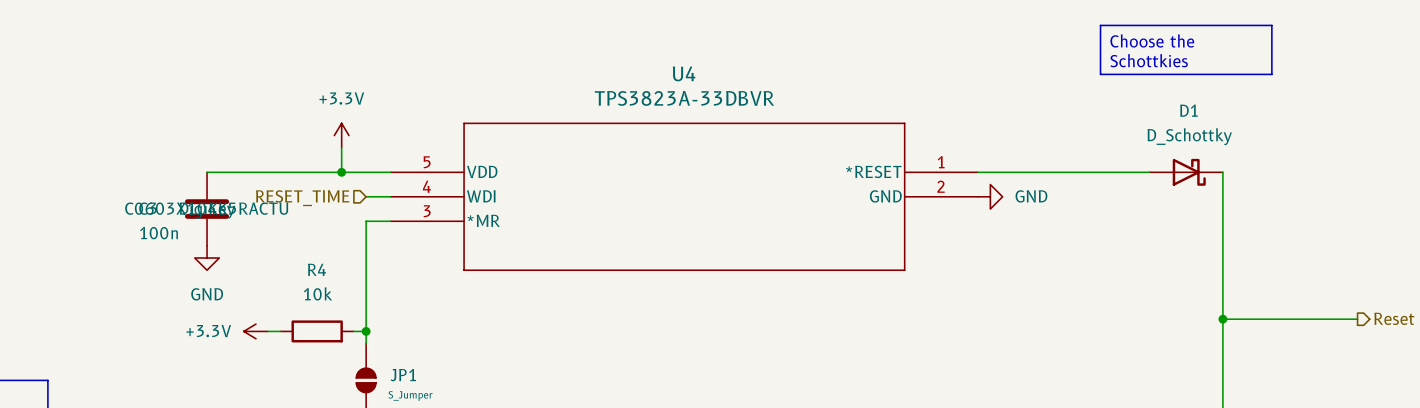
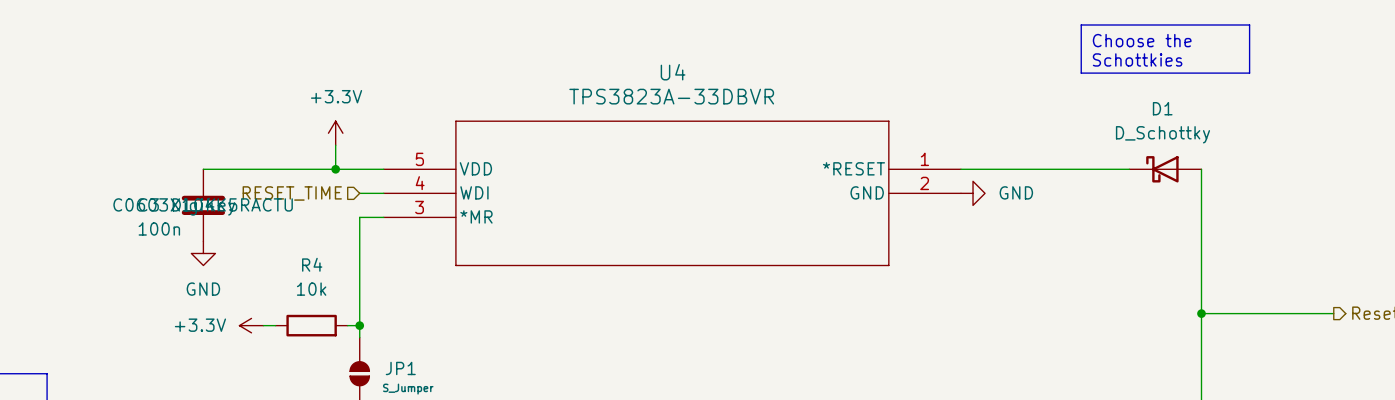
D1 rotation: 0° (1189, 172) -> 180° (1162, 169)

